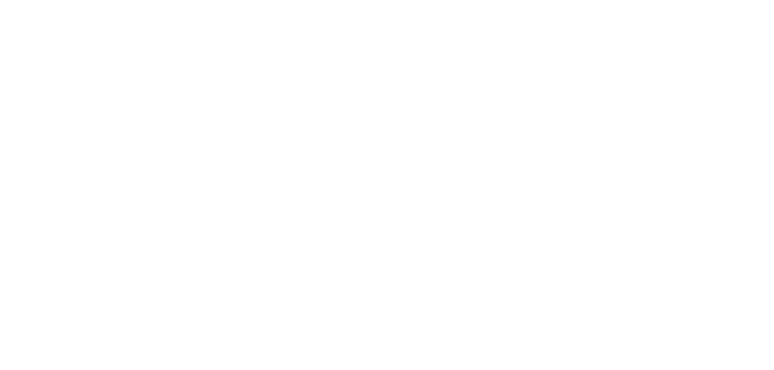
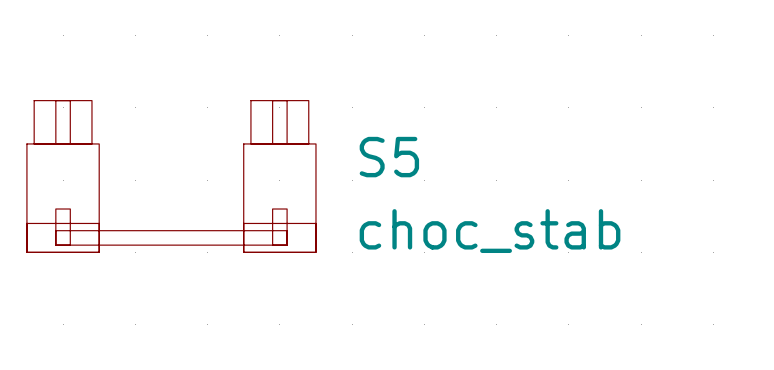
S5: none -> choc_stab (171, 176)

